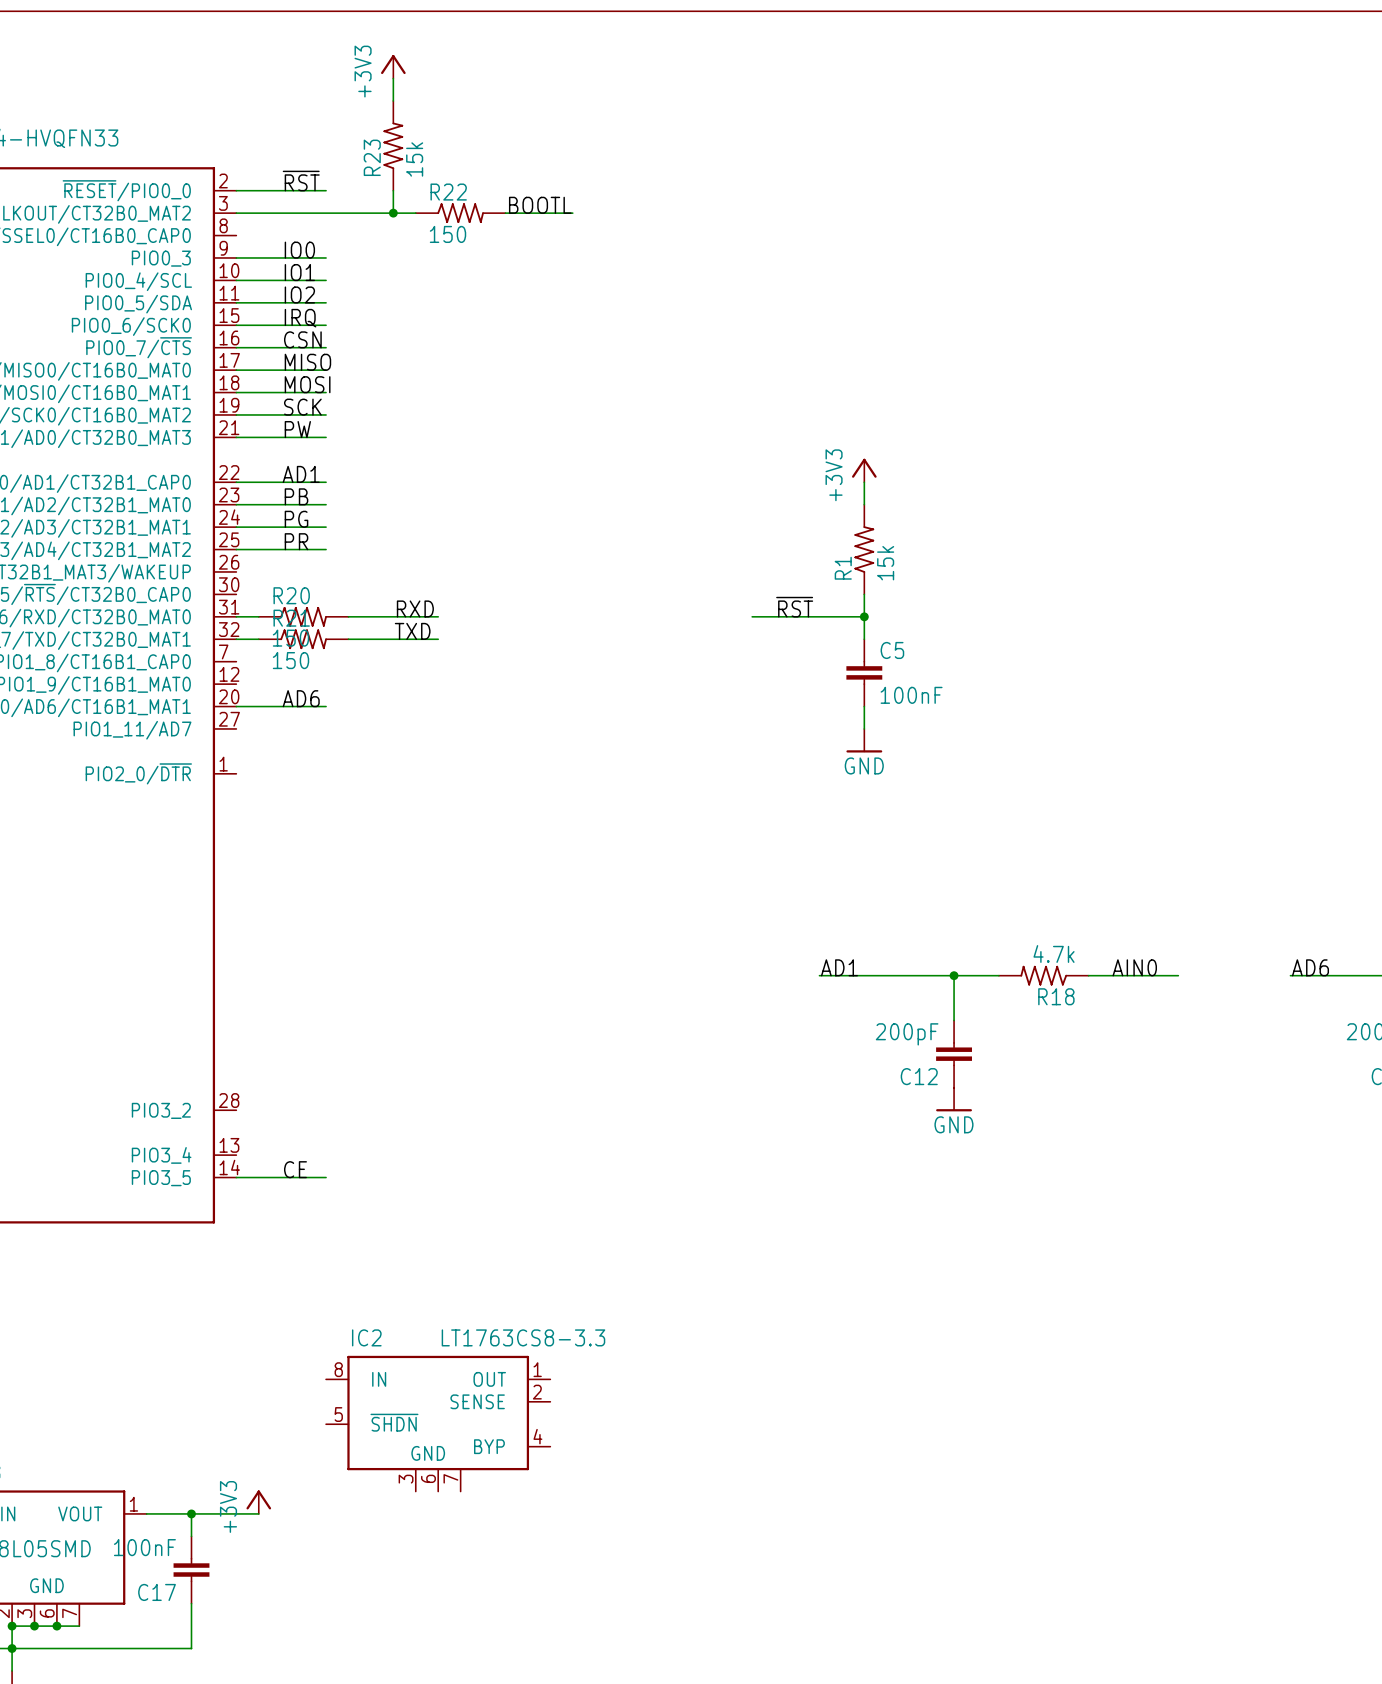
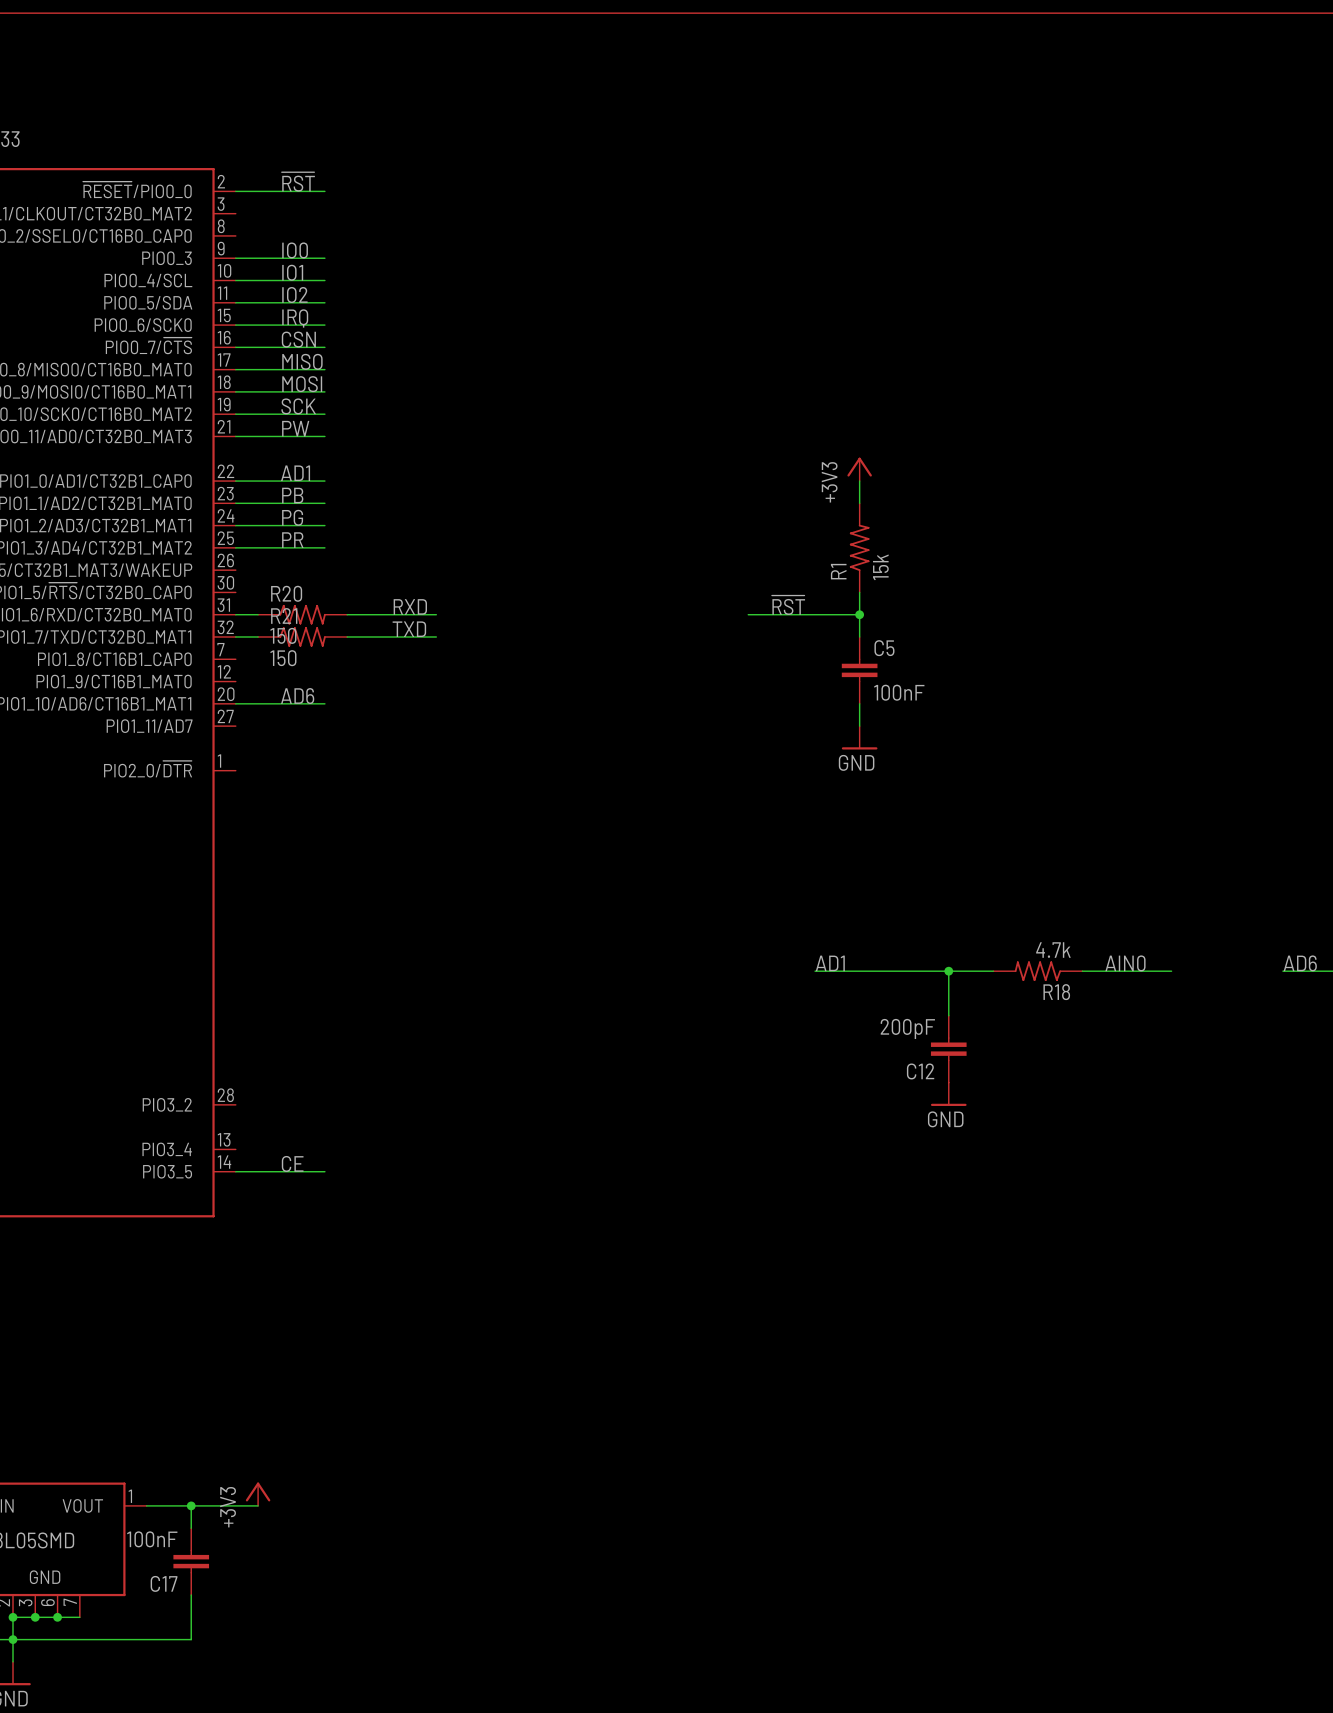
power symbol: +3V3 (393, 66) -> none
wire: (393, 78) (393, 100) -> none
R23: 15k (393, 145) -> none
wire: (393, 190) (393, 213) -> none
label: BOOTL (540, 205) -> none
wire: (236, 213) (415, 213) -> none
junction: (393, 213) -> none
R22: 150 (460, 213) -> none
wire: (505, 213) (572, 213) -> none
IC2: LT1763CS8-3.3 (438, 1423) -> none

